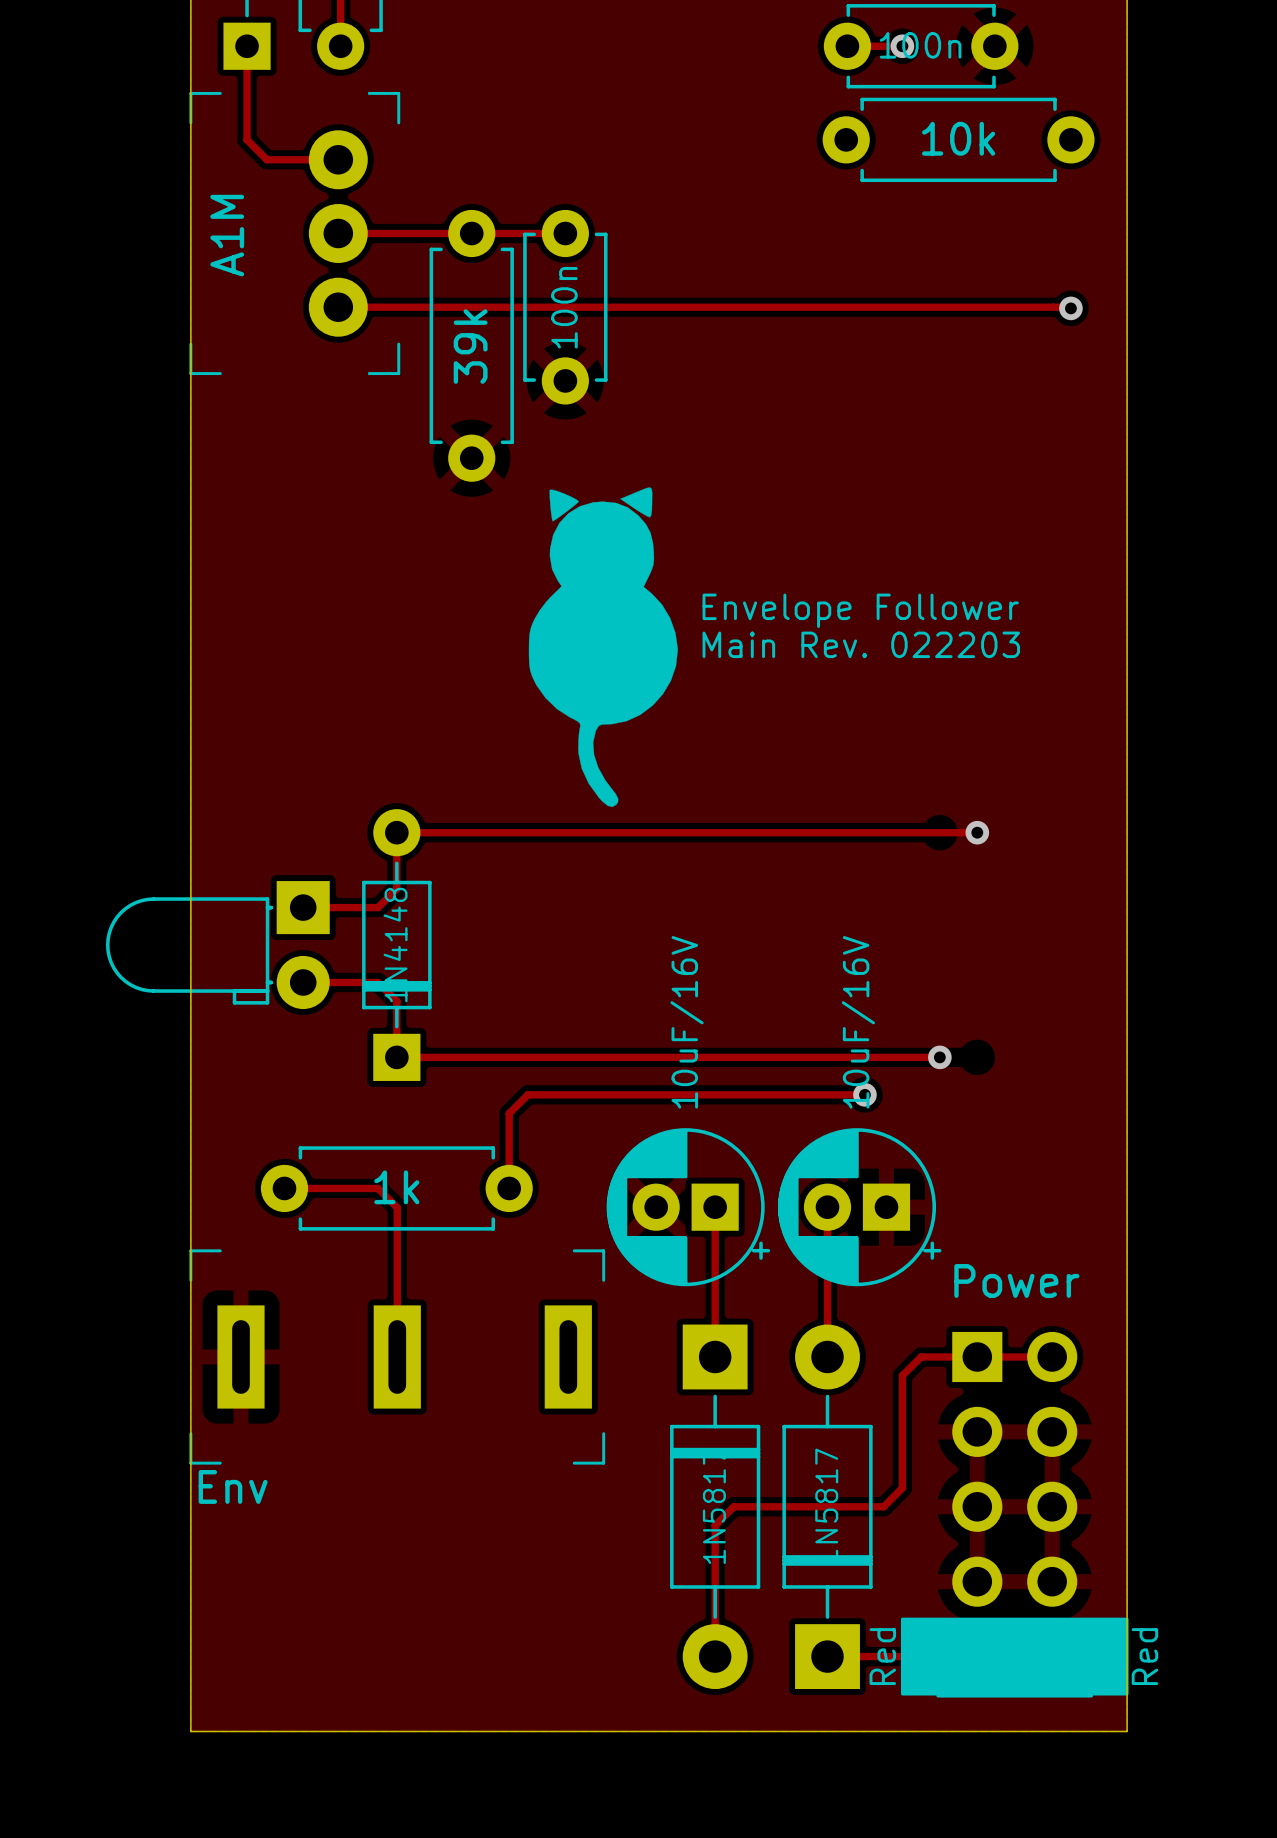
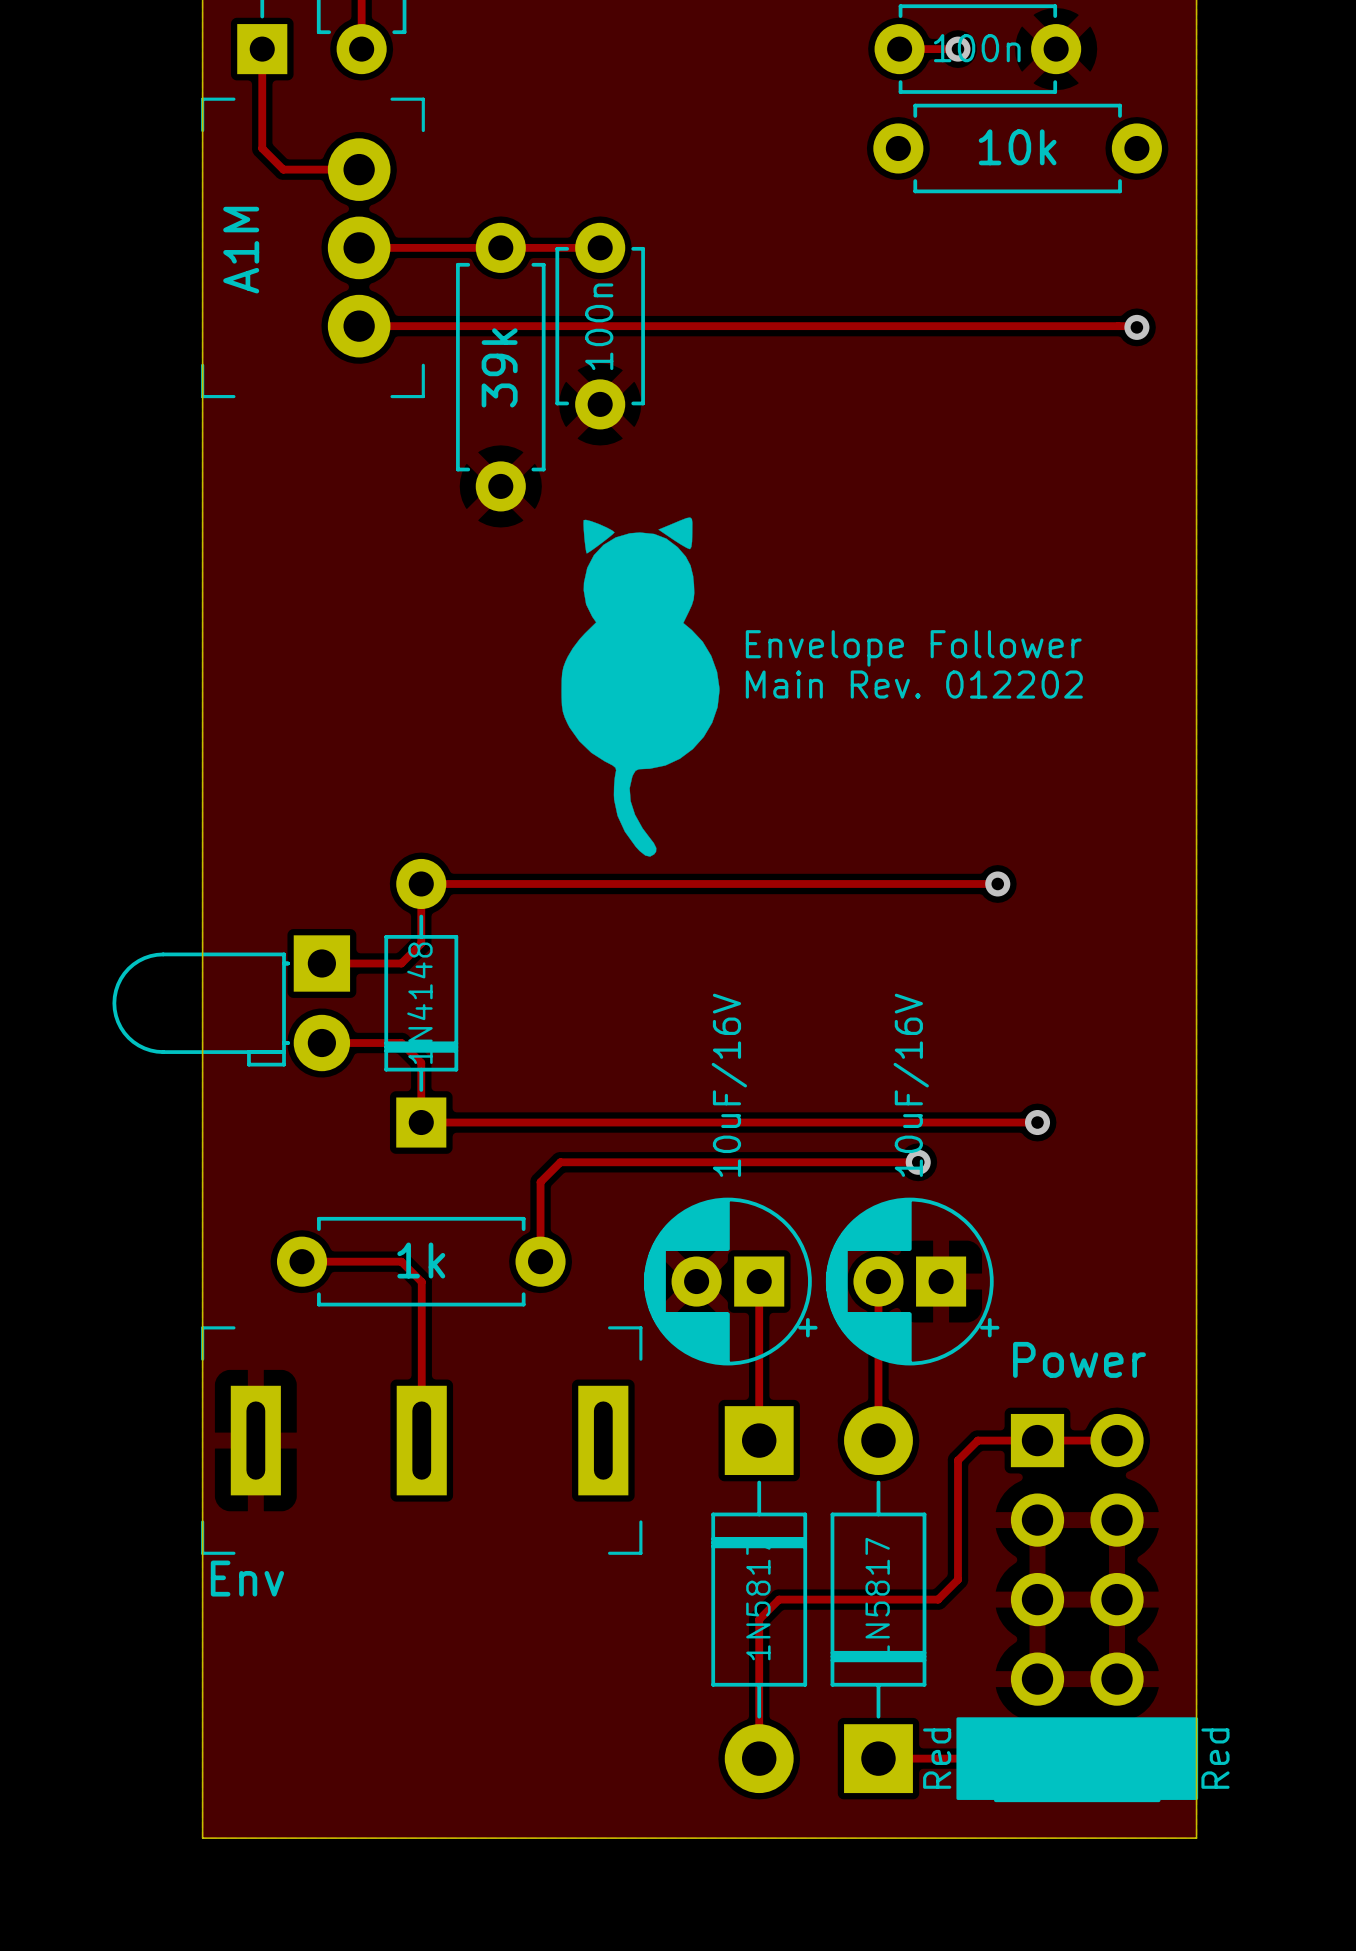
text: Main Rev. 022203 (861, 644) -> Main Rev. 012202 (914, 684)
track: (939, 832) (977, 832) -> (997, 1122) (1037, 1122)
via position: (977, 832) -> (997, 883)
via position: (939, 1057) -> (1037, 1122)

